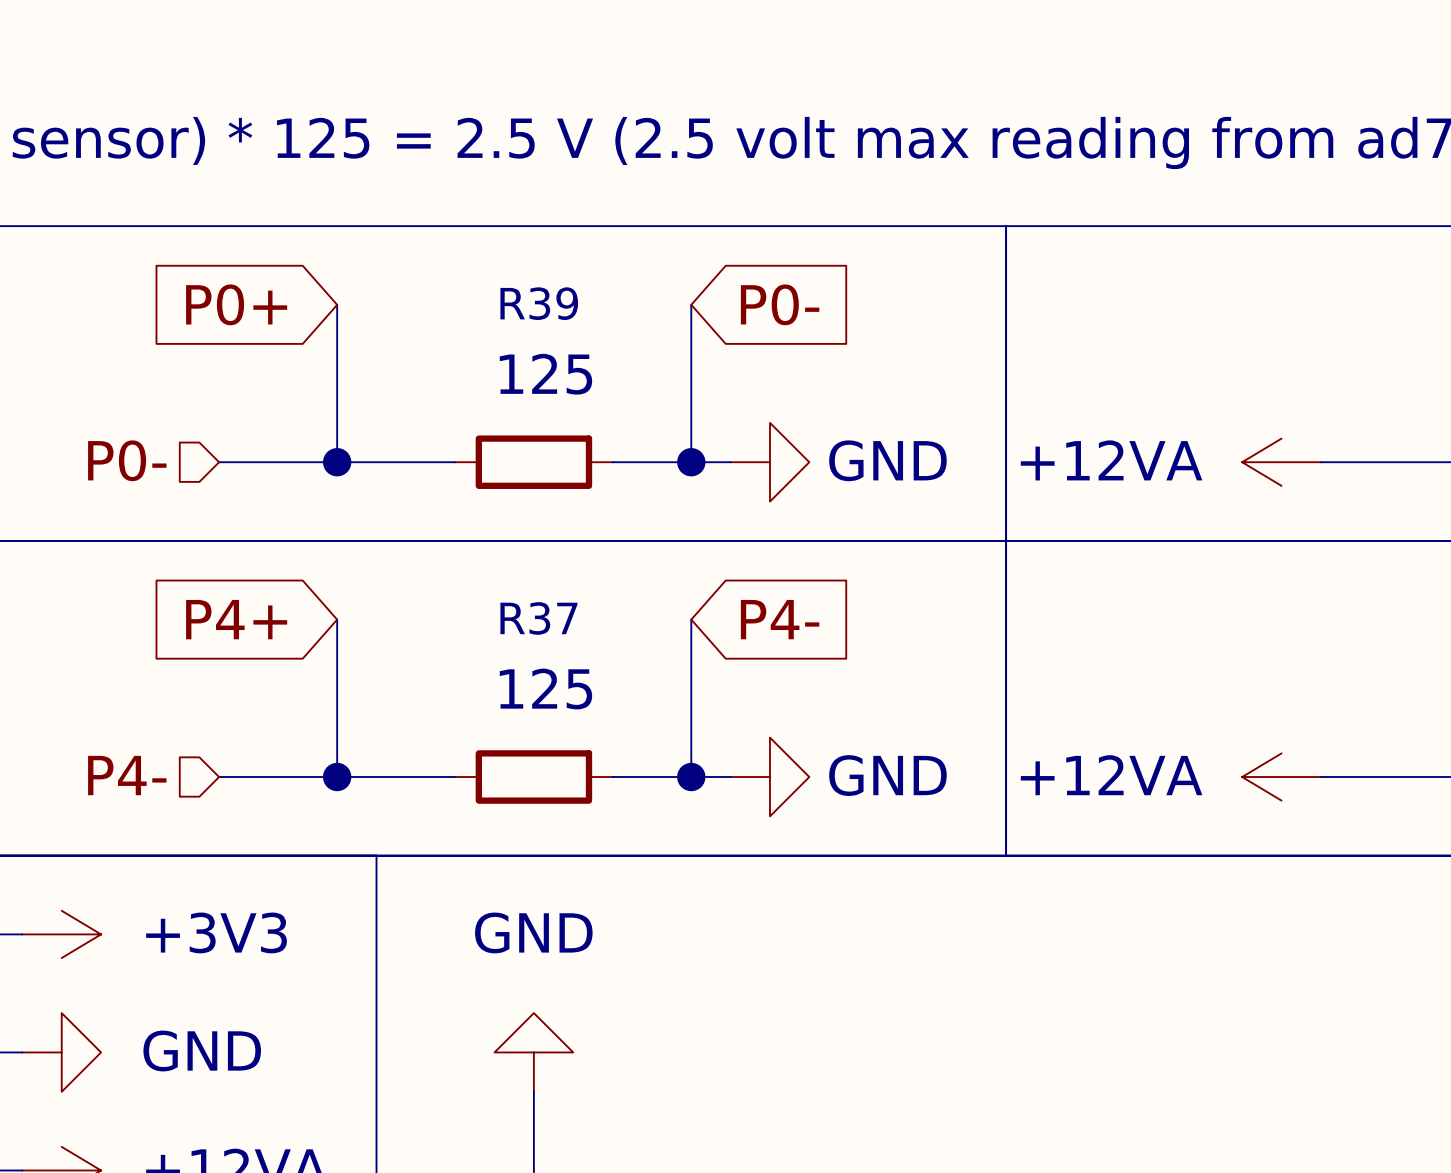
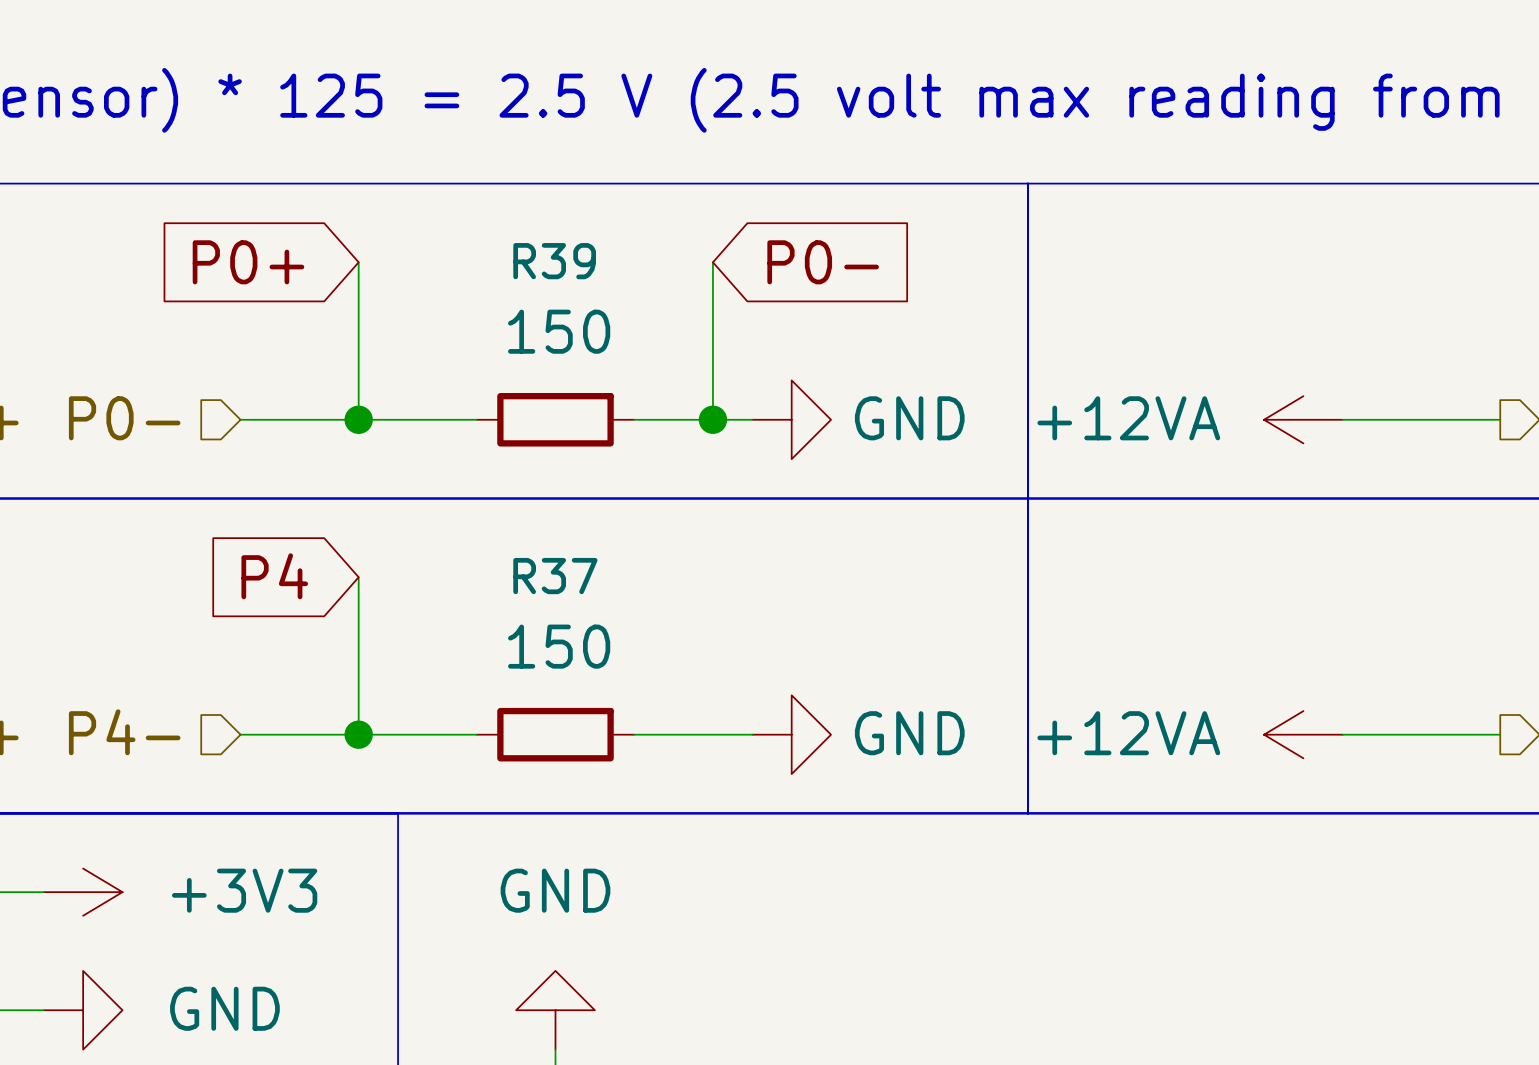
R39 value: 125 (545, 374) -> 150 (559, 331)
global label: P4+ (236, 619) -> P4 (274, 576)
wire: (691, 619) (691, 777) -> none
global label: P4- (780, 619) -> none
R37 value: 125 (545, 689) -> 150 (559, 646)
junction: (691, 777) -> none

